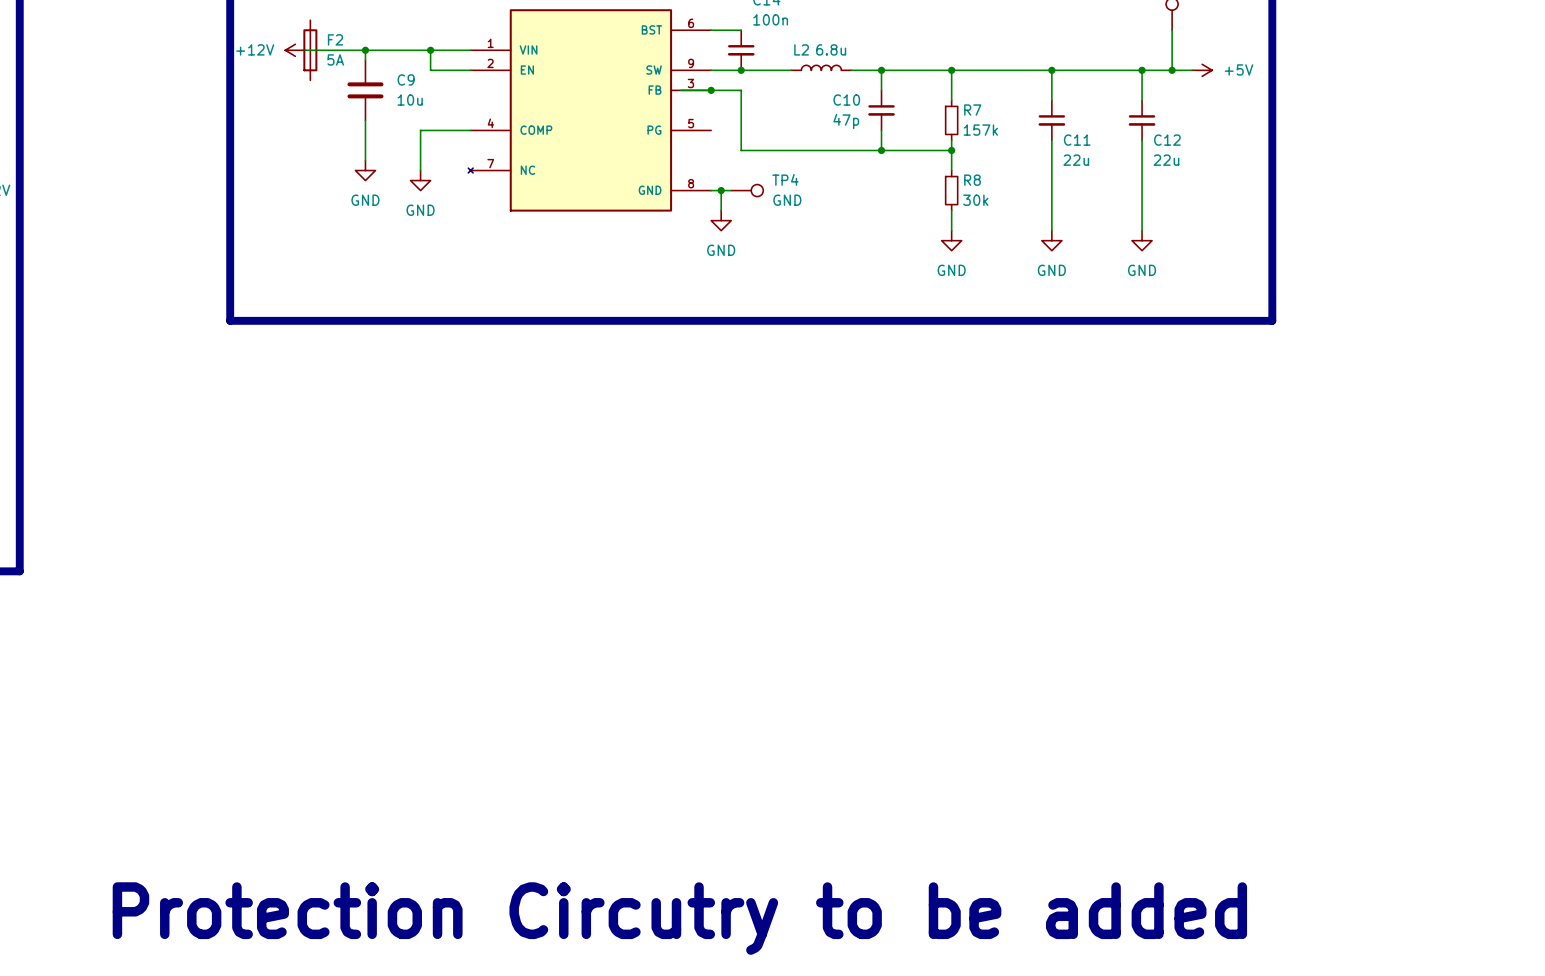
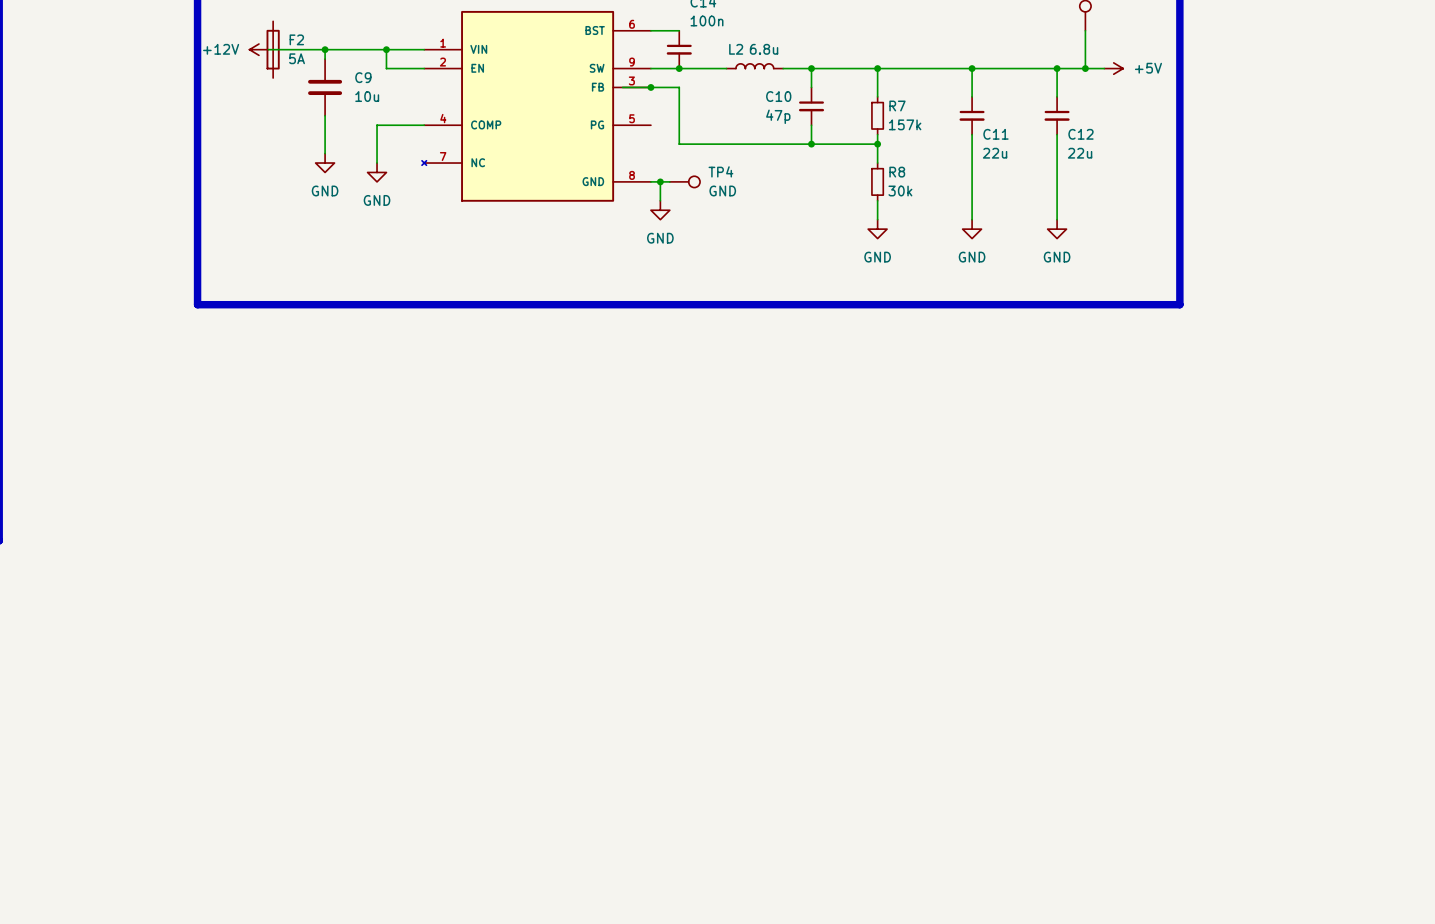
text: Protection Circutry to be added (679, 918) -> none

